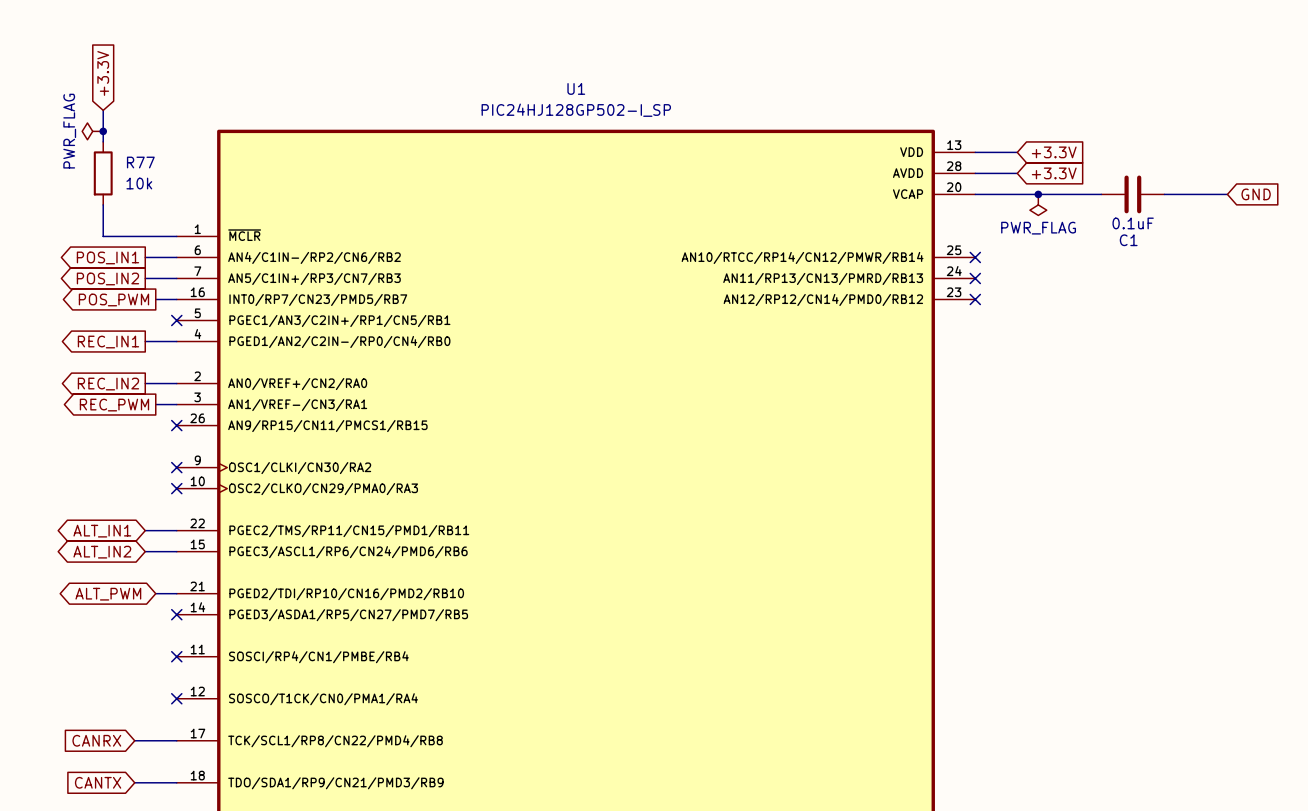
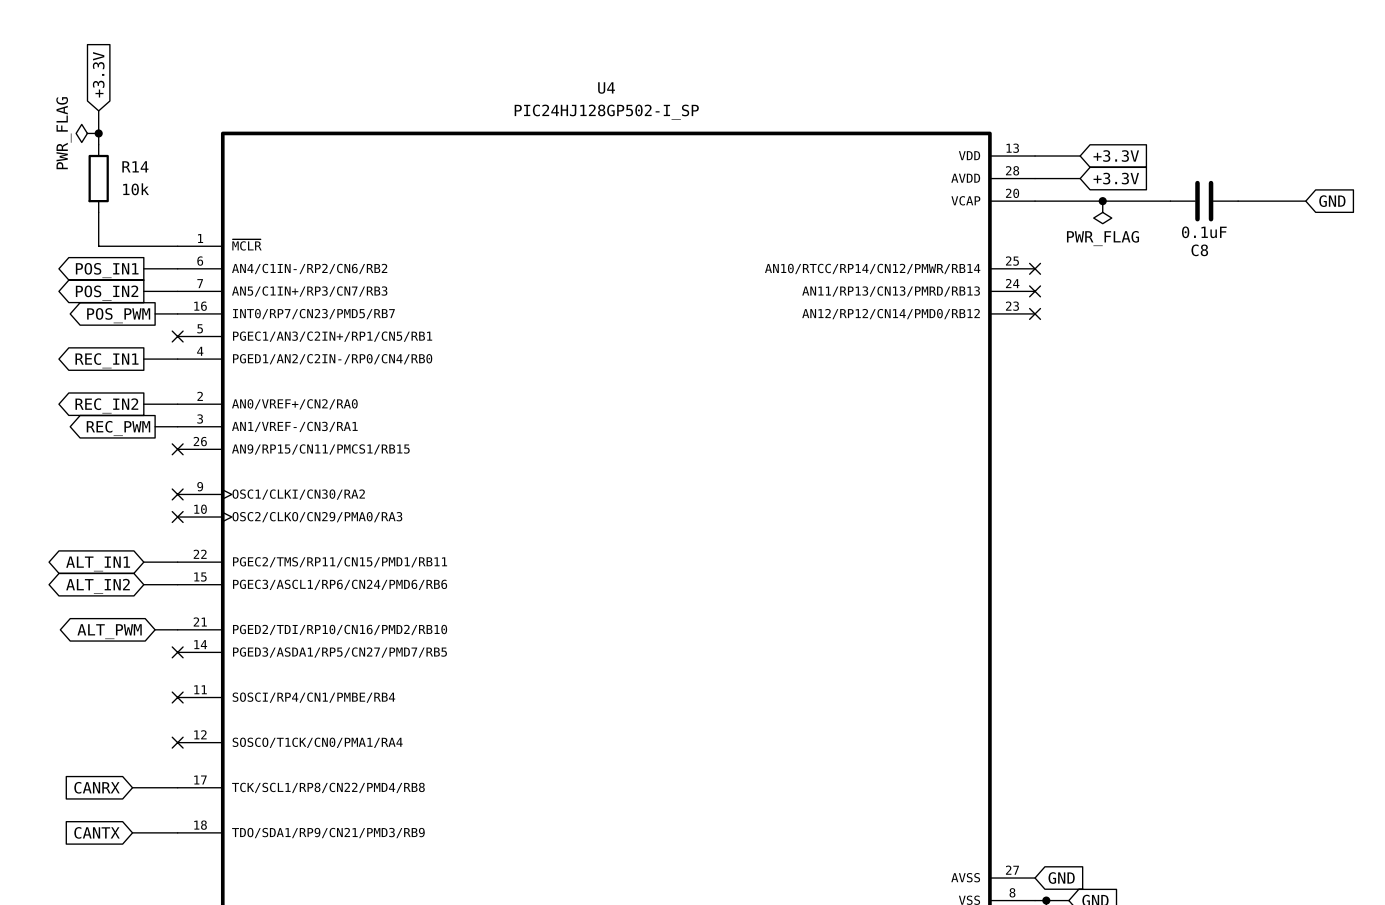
U1 name: U1 (576, 88) -> U4 (606, 88)
R77 name: R77 (140, 162) -> R14 (135, 166)
C1 name: C1 (1128, 240) -> C8 (1199, 250)

